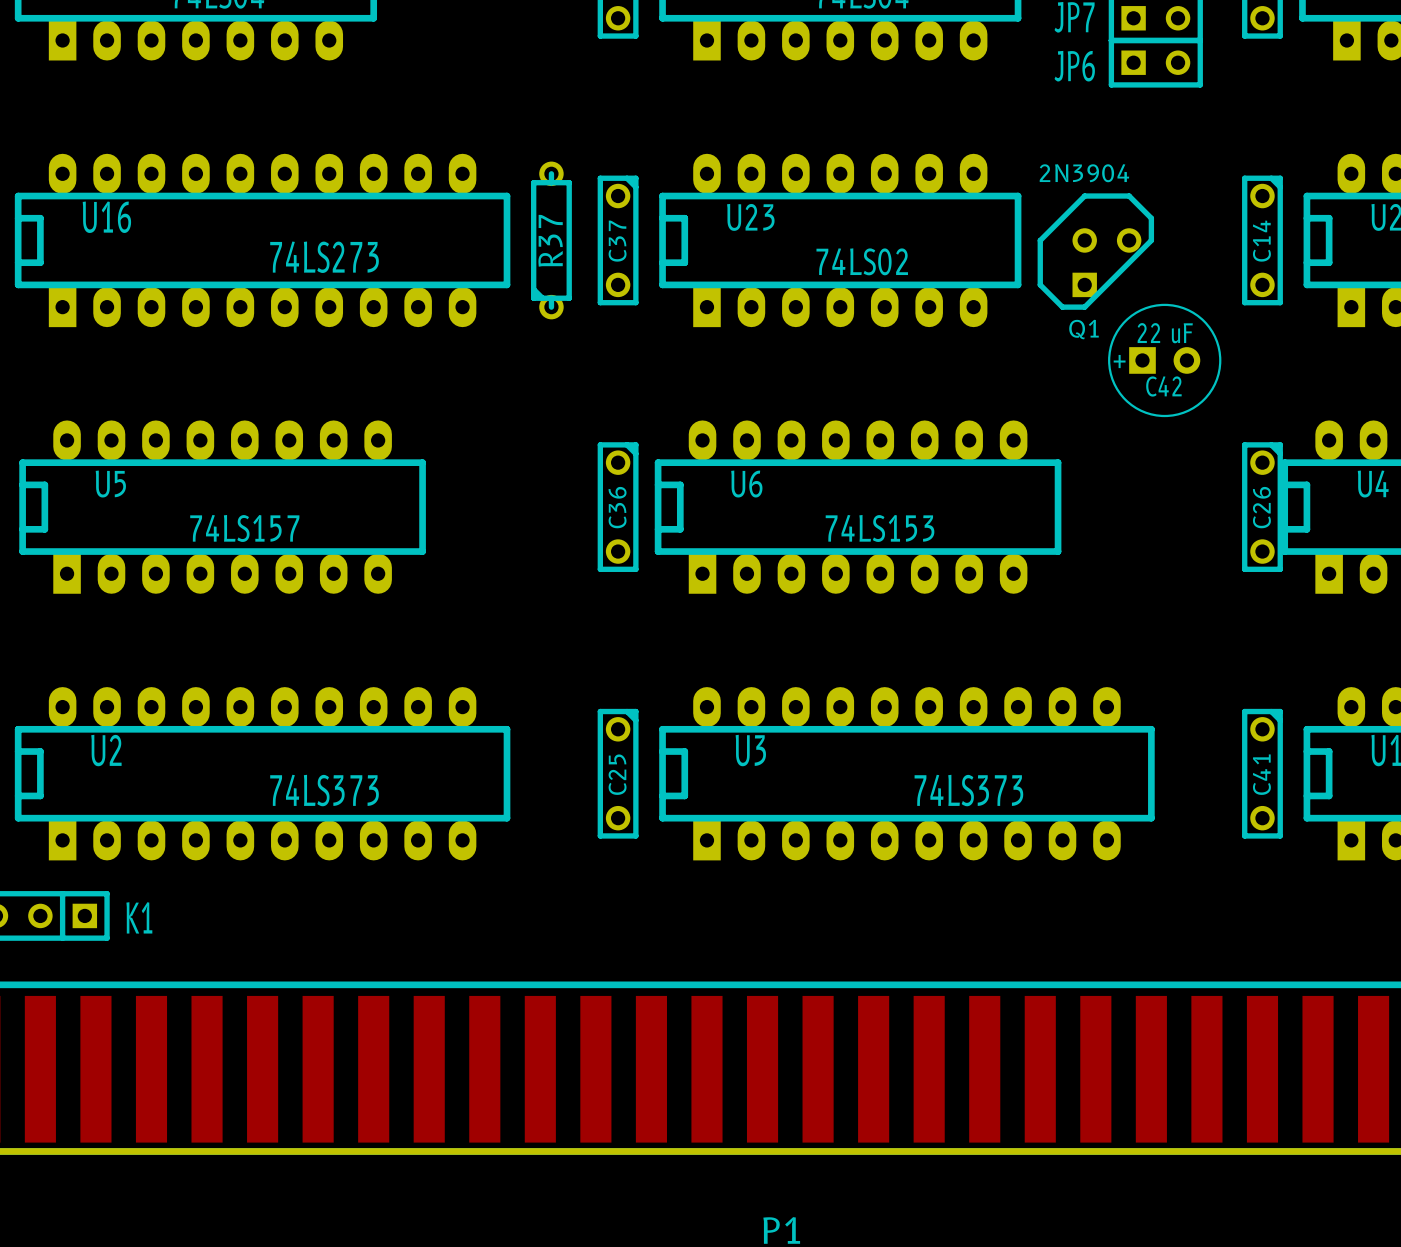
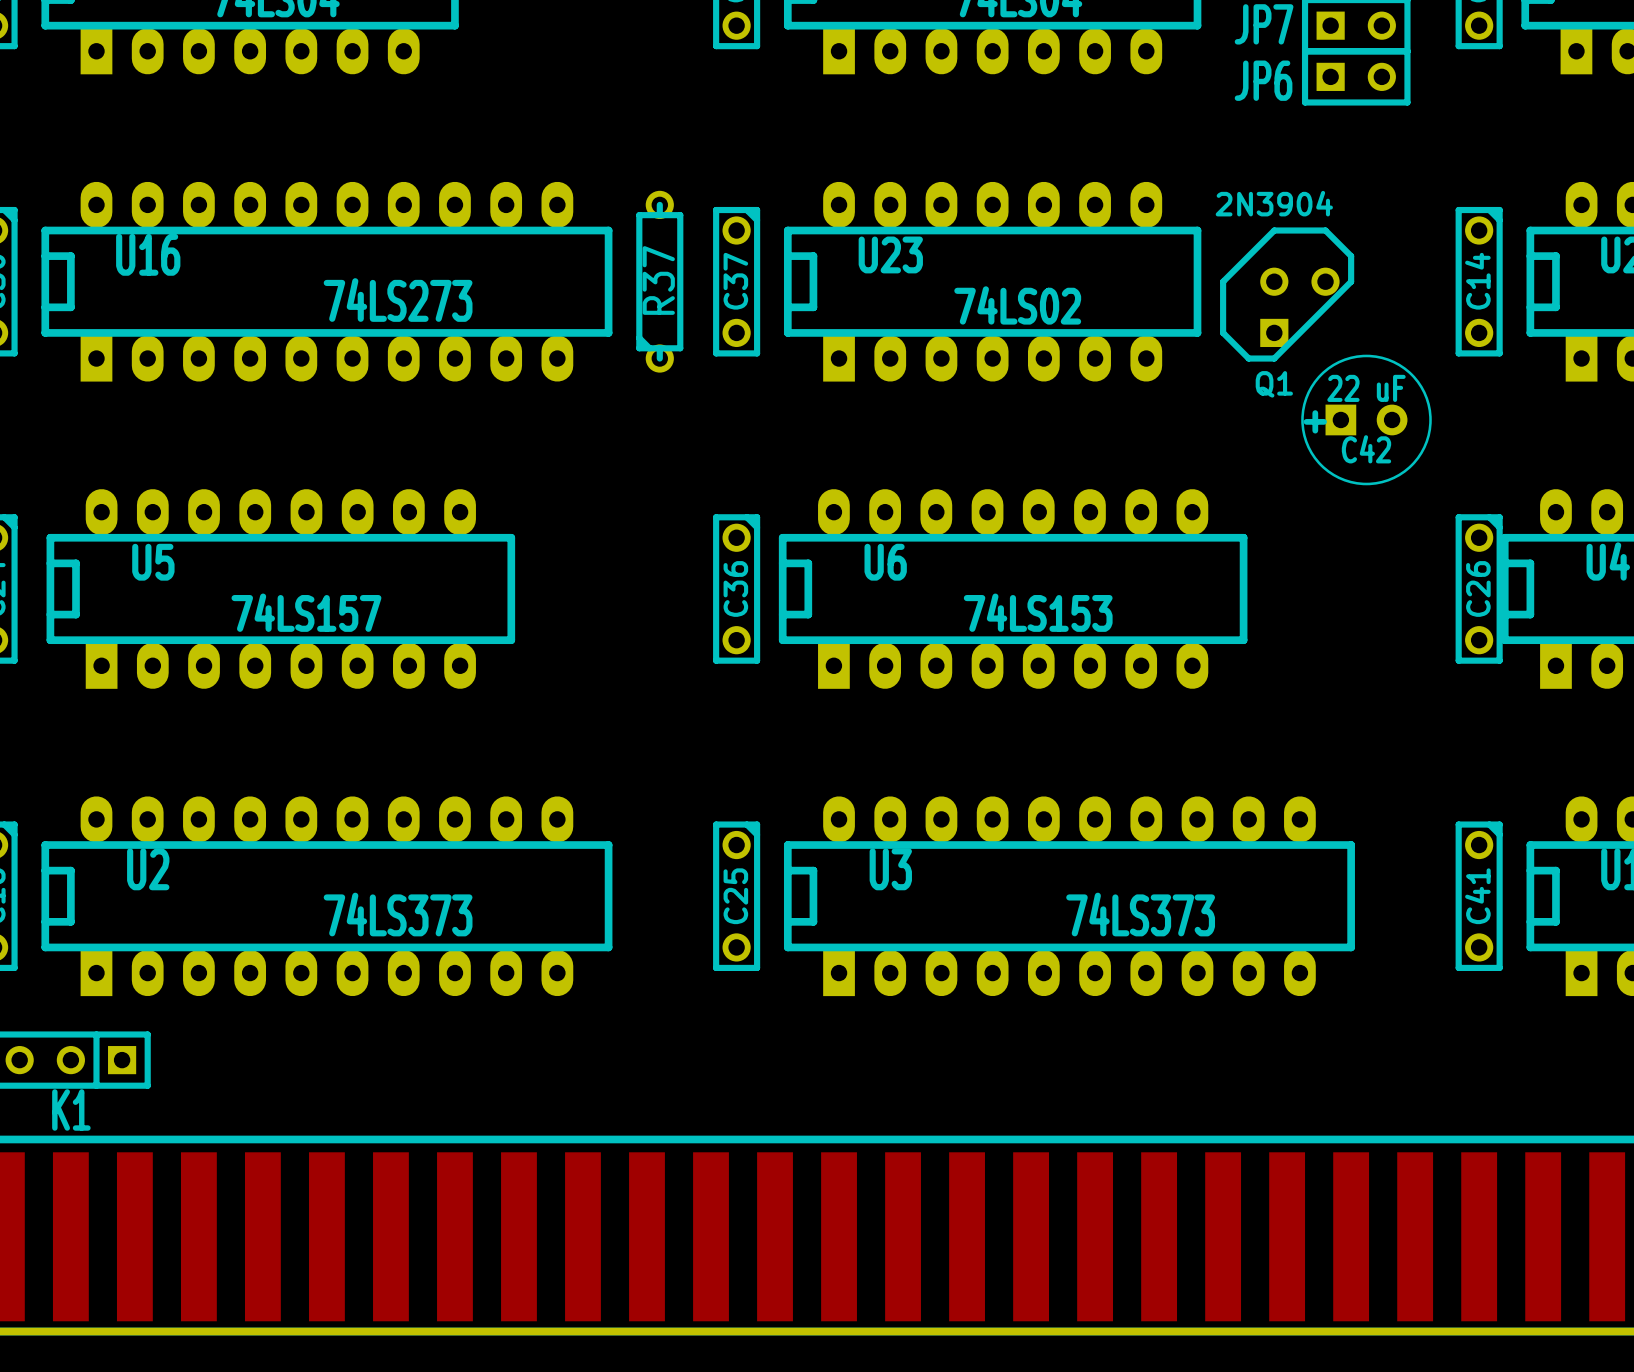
K1 name position: K1 (139, 917) -> K1 (71, 1109)

